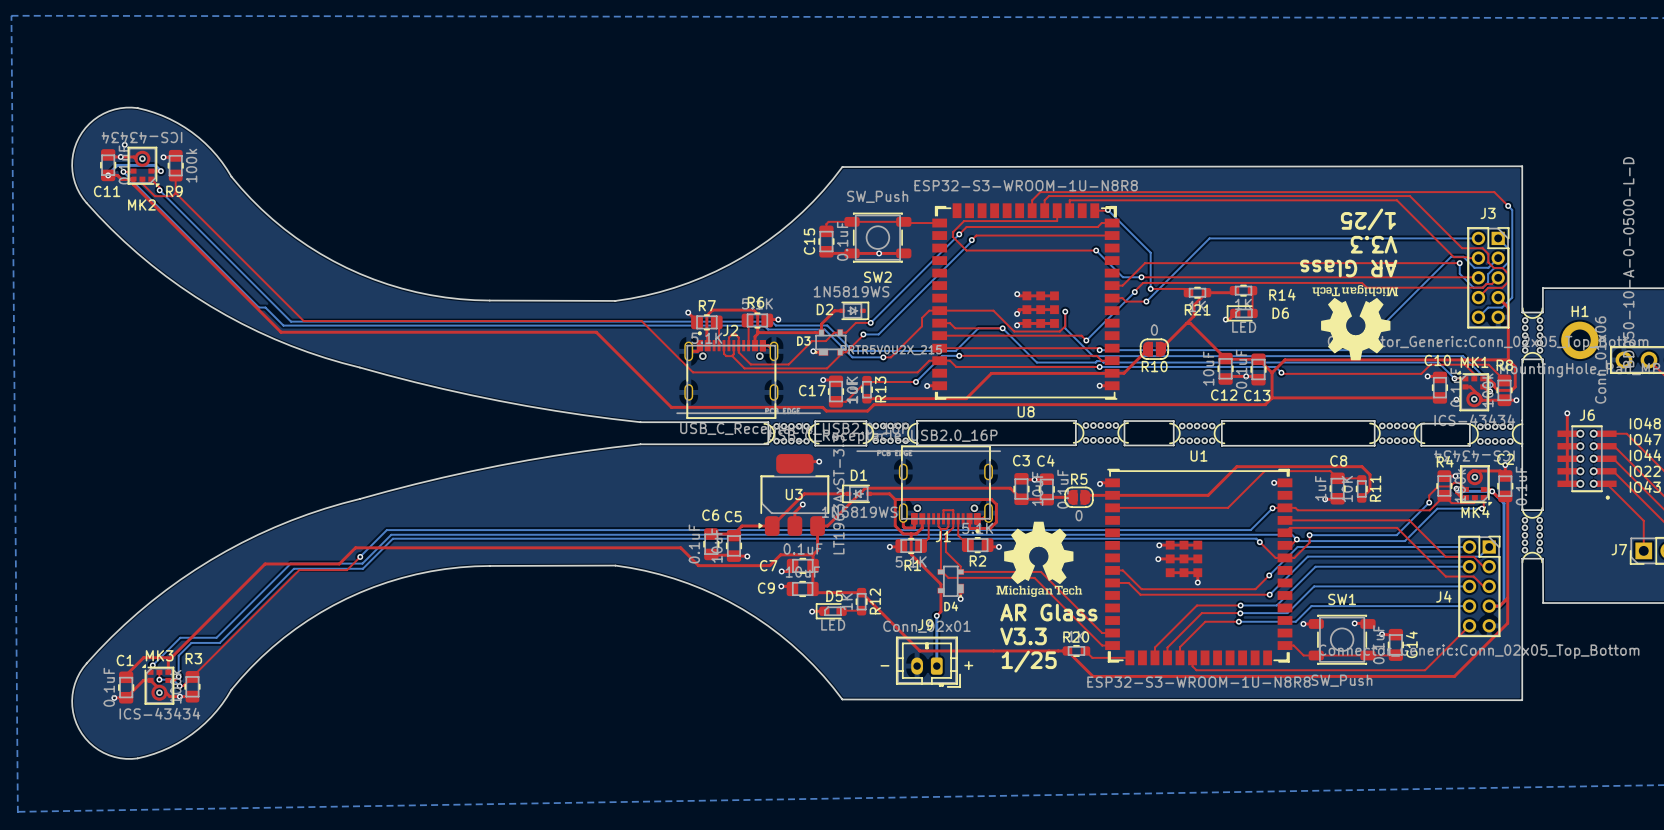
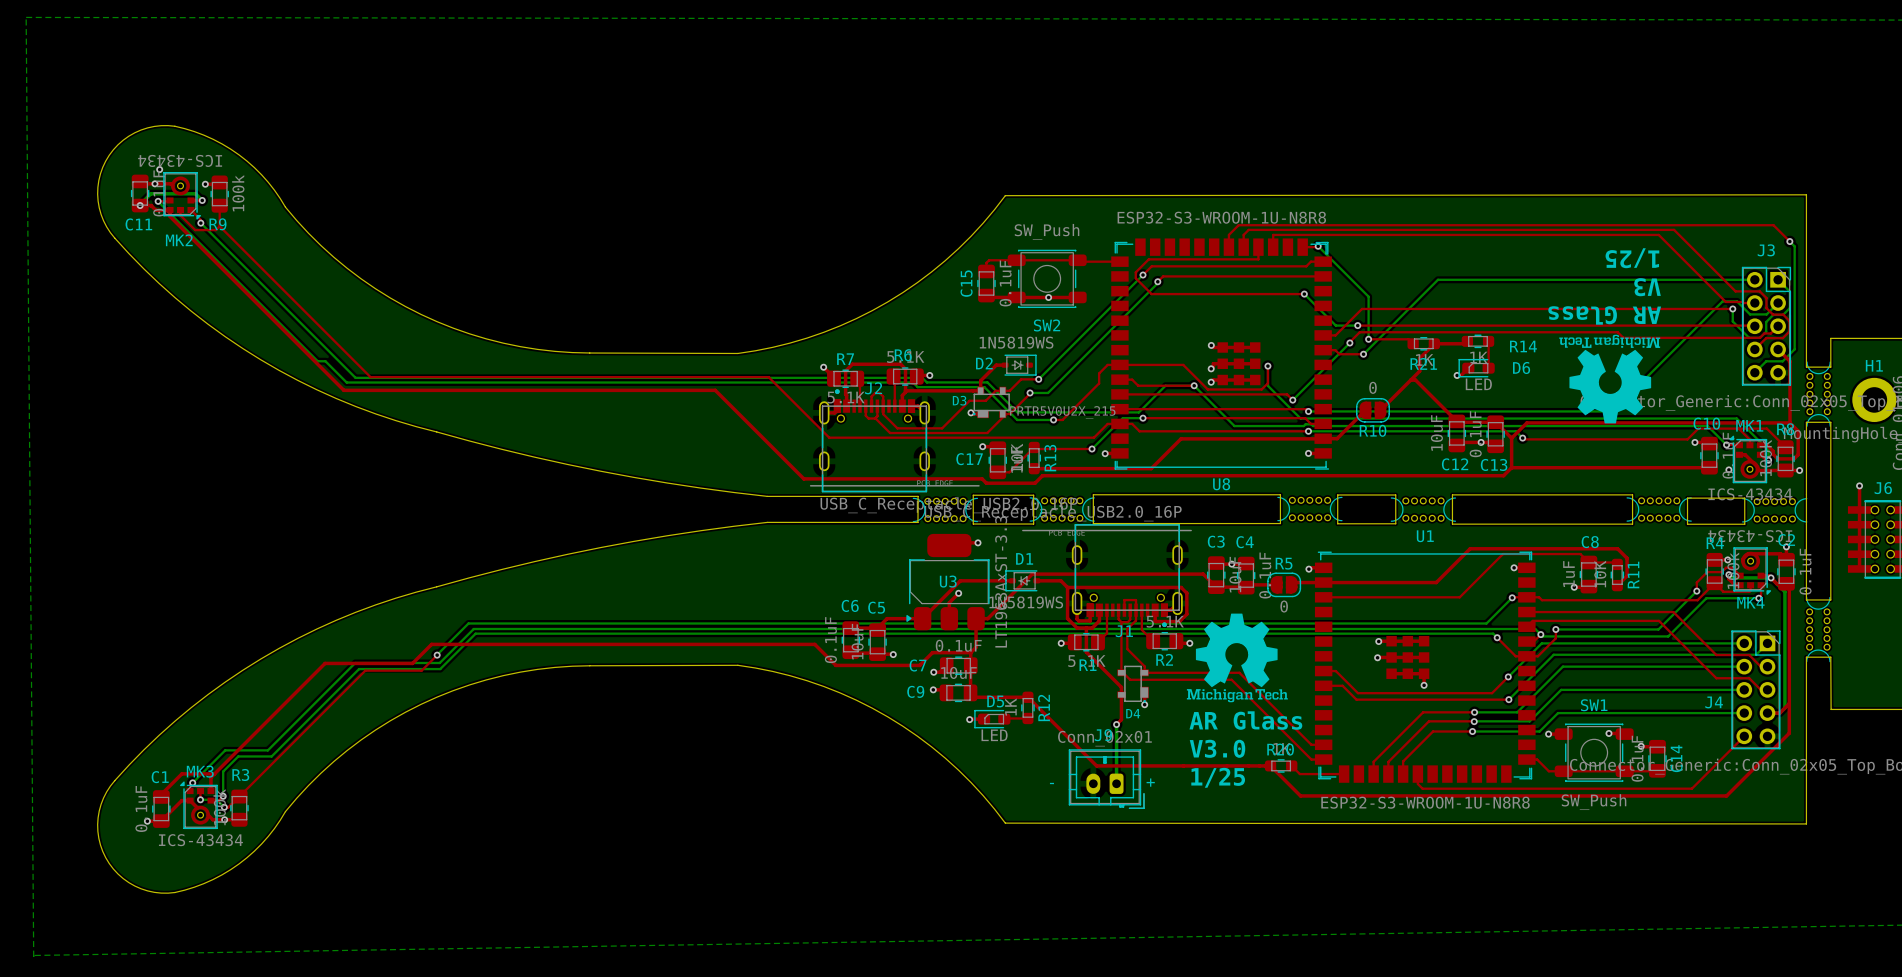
text: V3.3 (1374, 244) -> V3 (1647, 287)
text: V3.3 (1023, 636) -> V3.0 (1217, 748)

